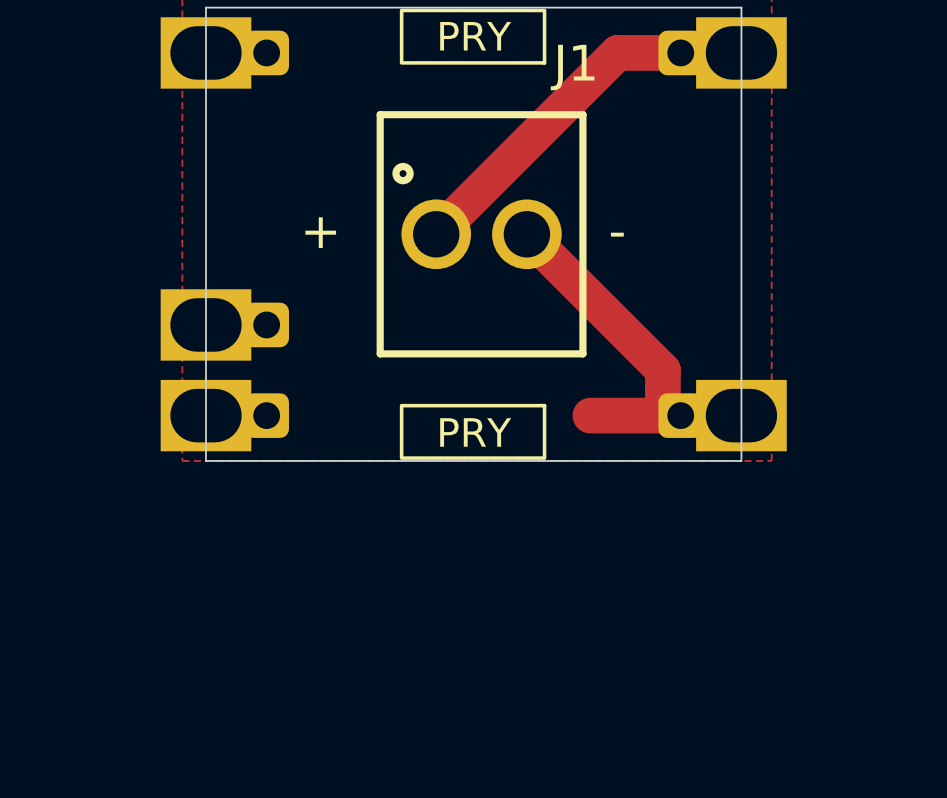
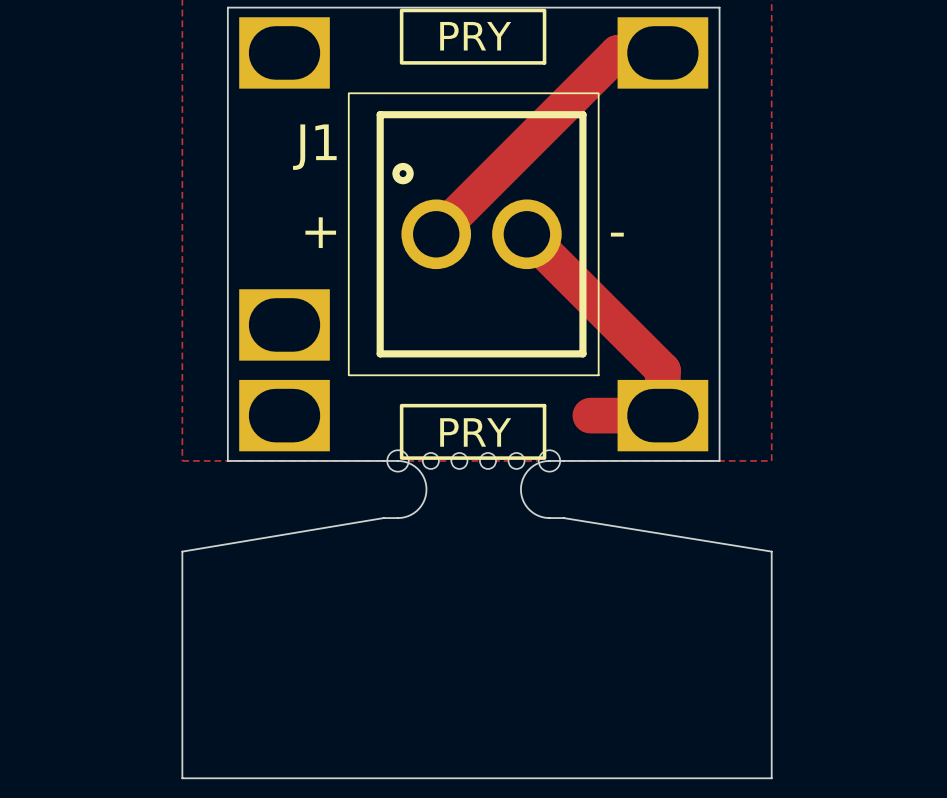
part footprint: [160, 6, 787, 462] -> [226, 6, 721, 519]
J1 name position: J1 (572, 67) -> J1 (314, 147)
board edge: none -> (383, 518) (182, 551) (182, 778) (771, 778) (771, 551) (563, 518)

